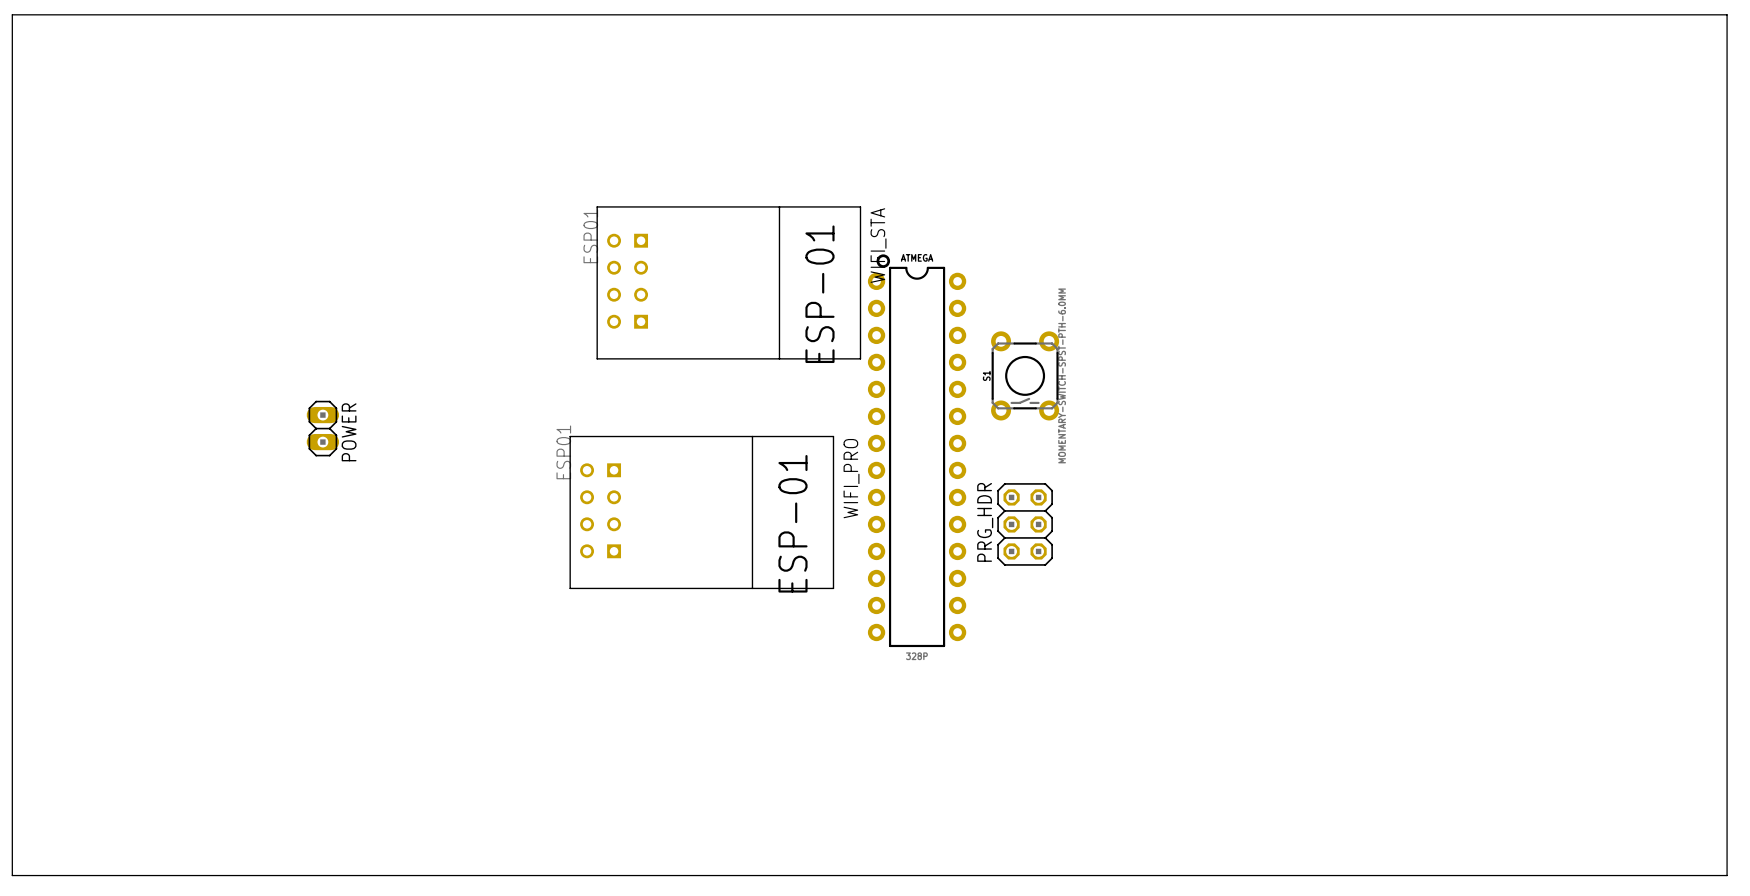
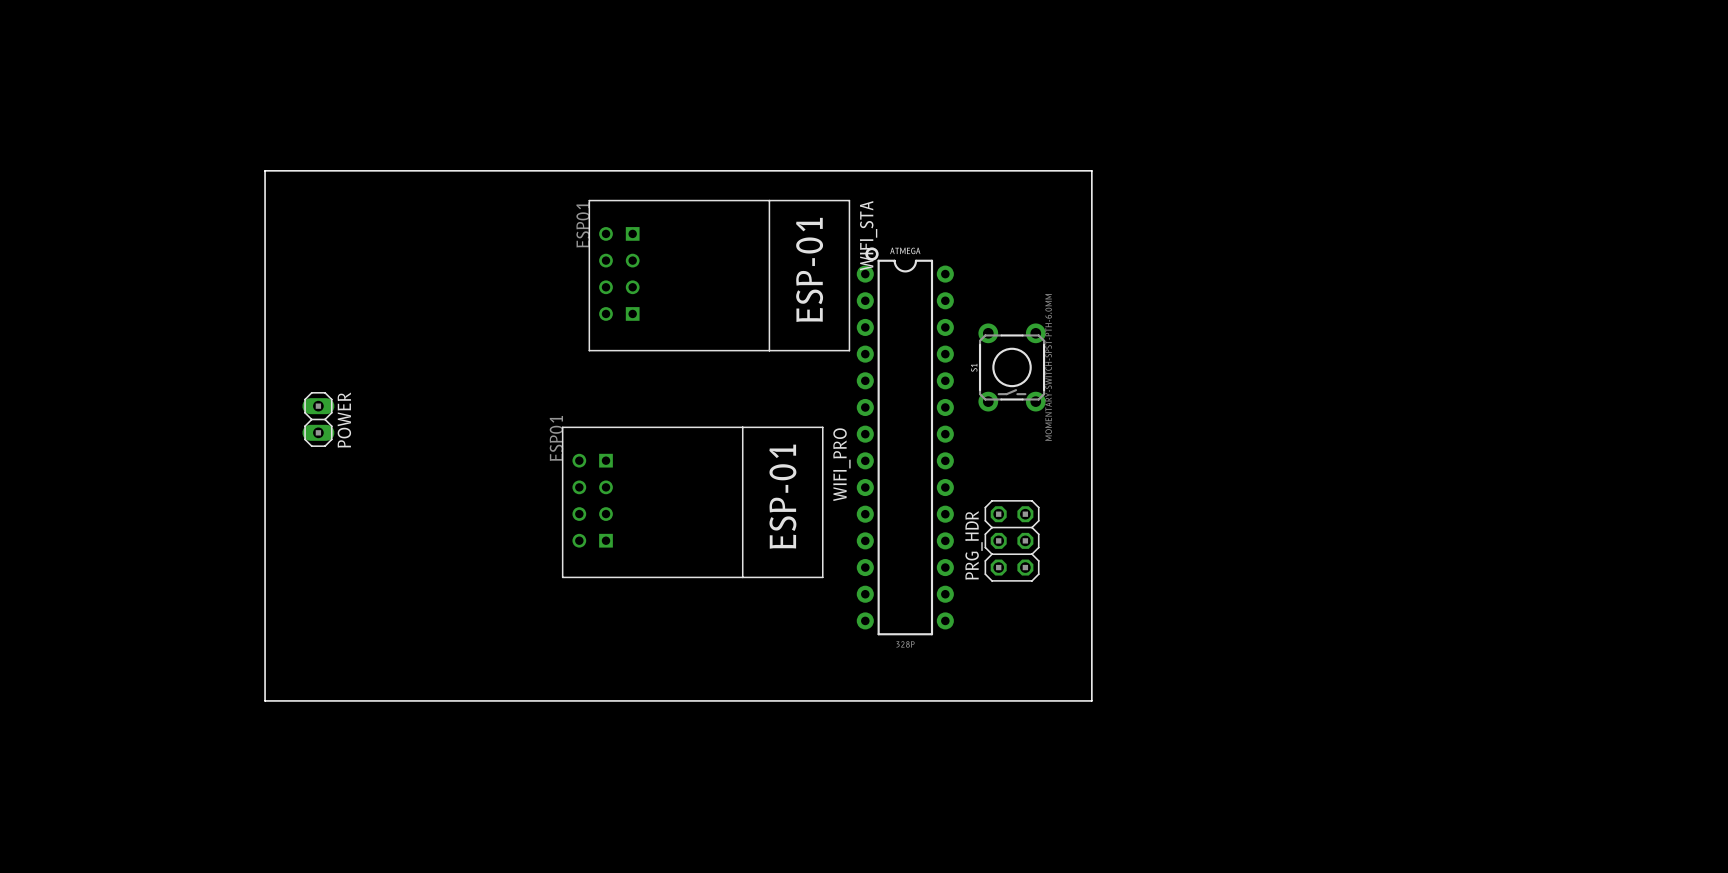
board edge: (12, 14) (1727, 14) (1727, 875) (12, 875) (12, 14) -> none
board edge: none -> (265, 170) (1091, 170) (1091, 700) (265, 700) (265, 170)
PRG_HDR position: (1025, 524) -> (1012, 540)

